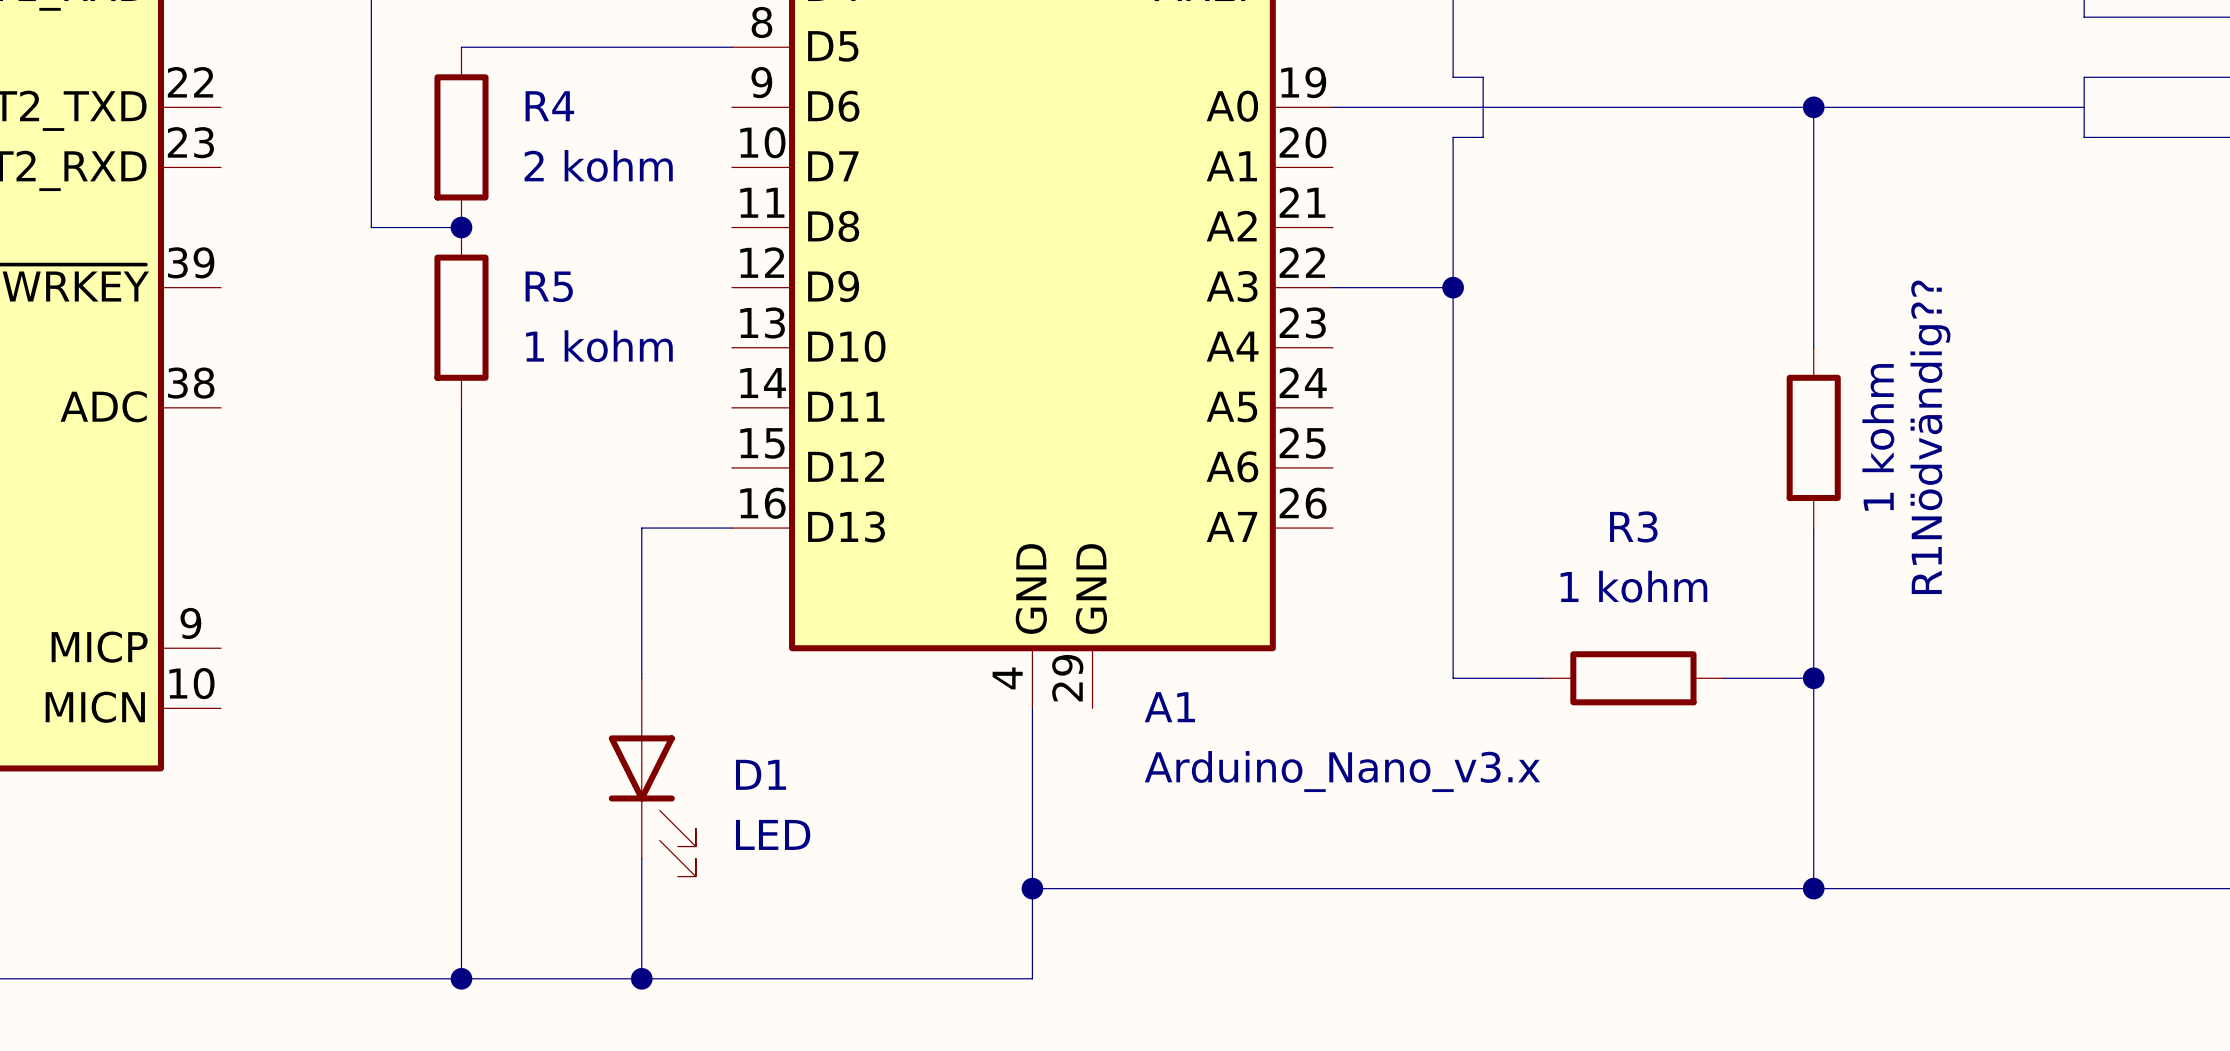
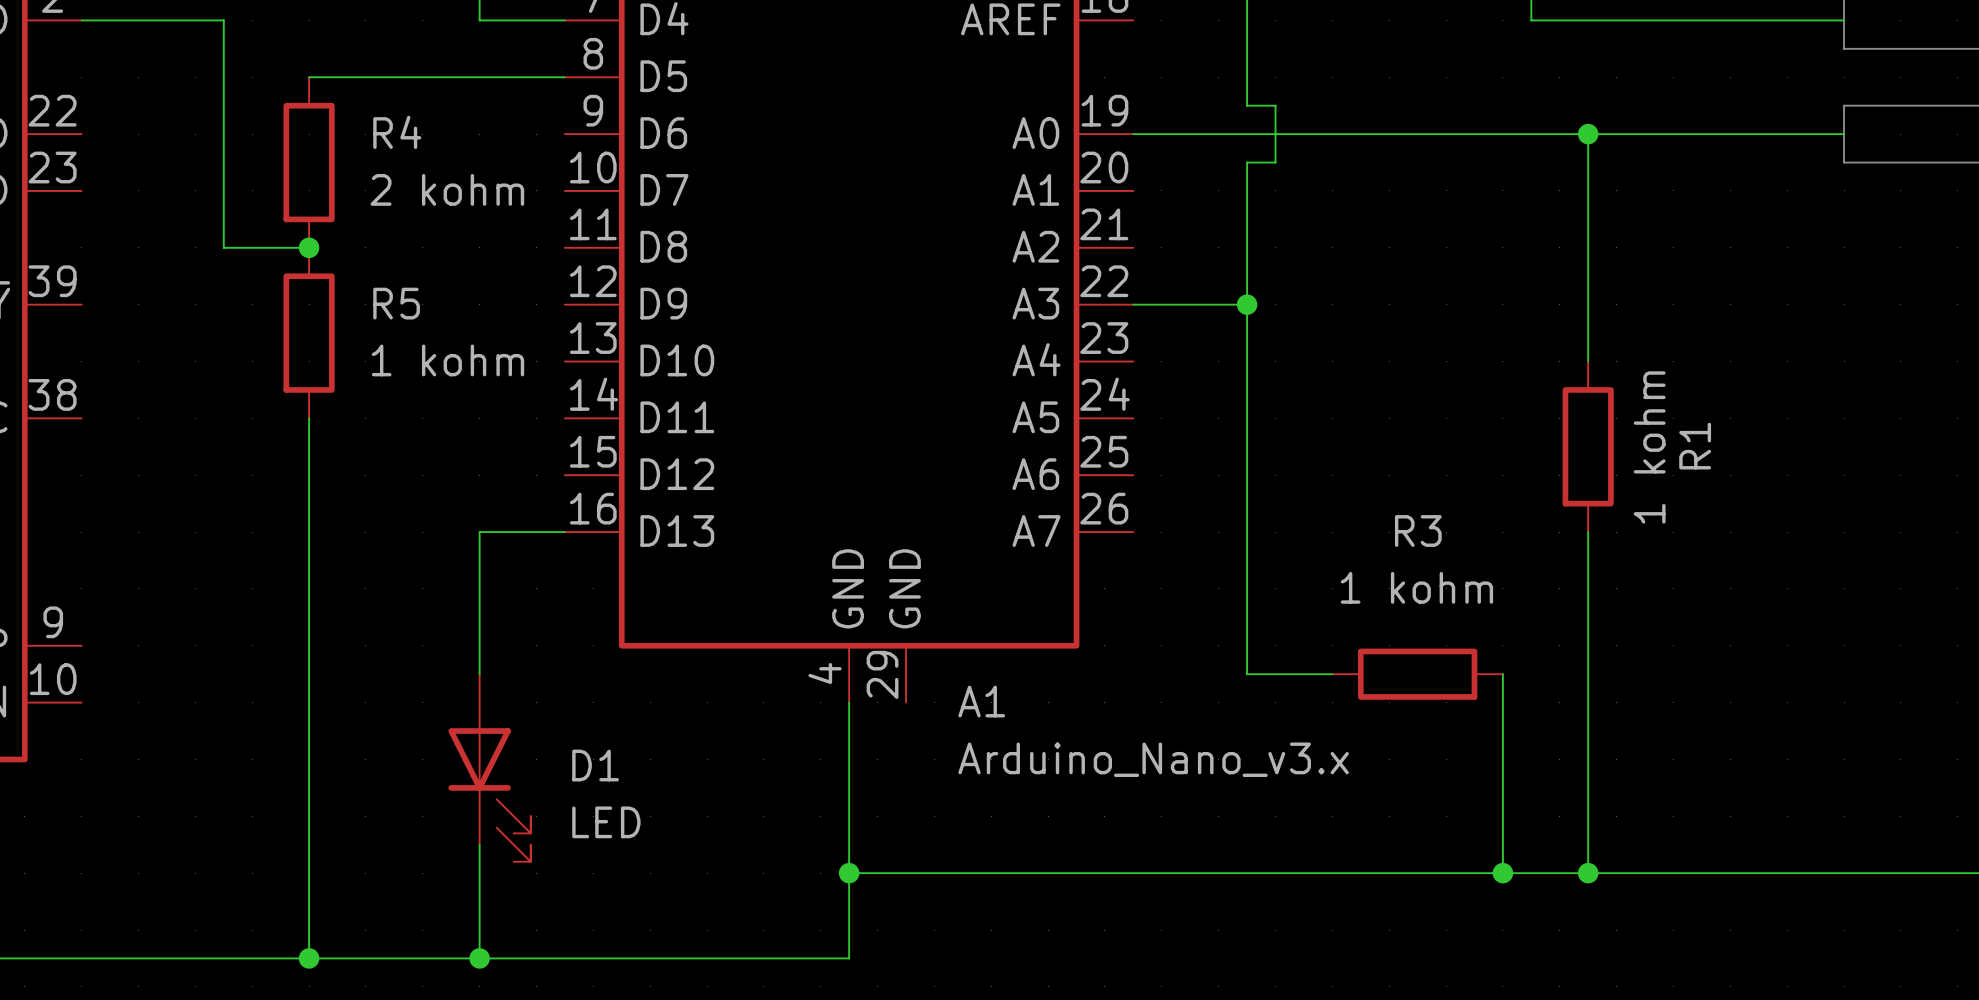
R1Nödvändig?? name: R1Nödvändig?? (1930, 437) -> R1 (1695, 446)
wire: (1723, 678) (1813, 678) -> (1502, 674) (1502, 873)
junction: (1813, 678) -> none
junction: none -> (1502, 873)

